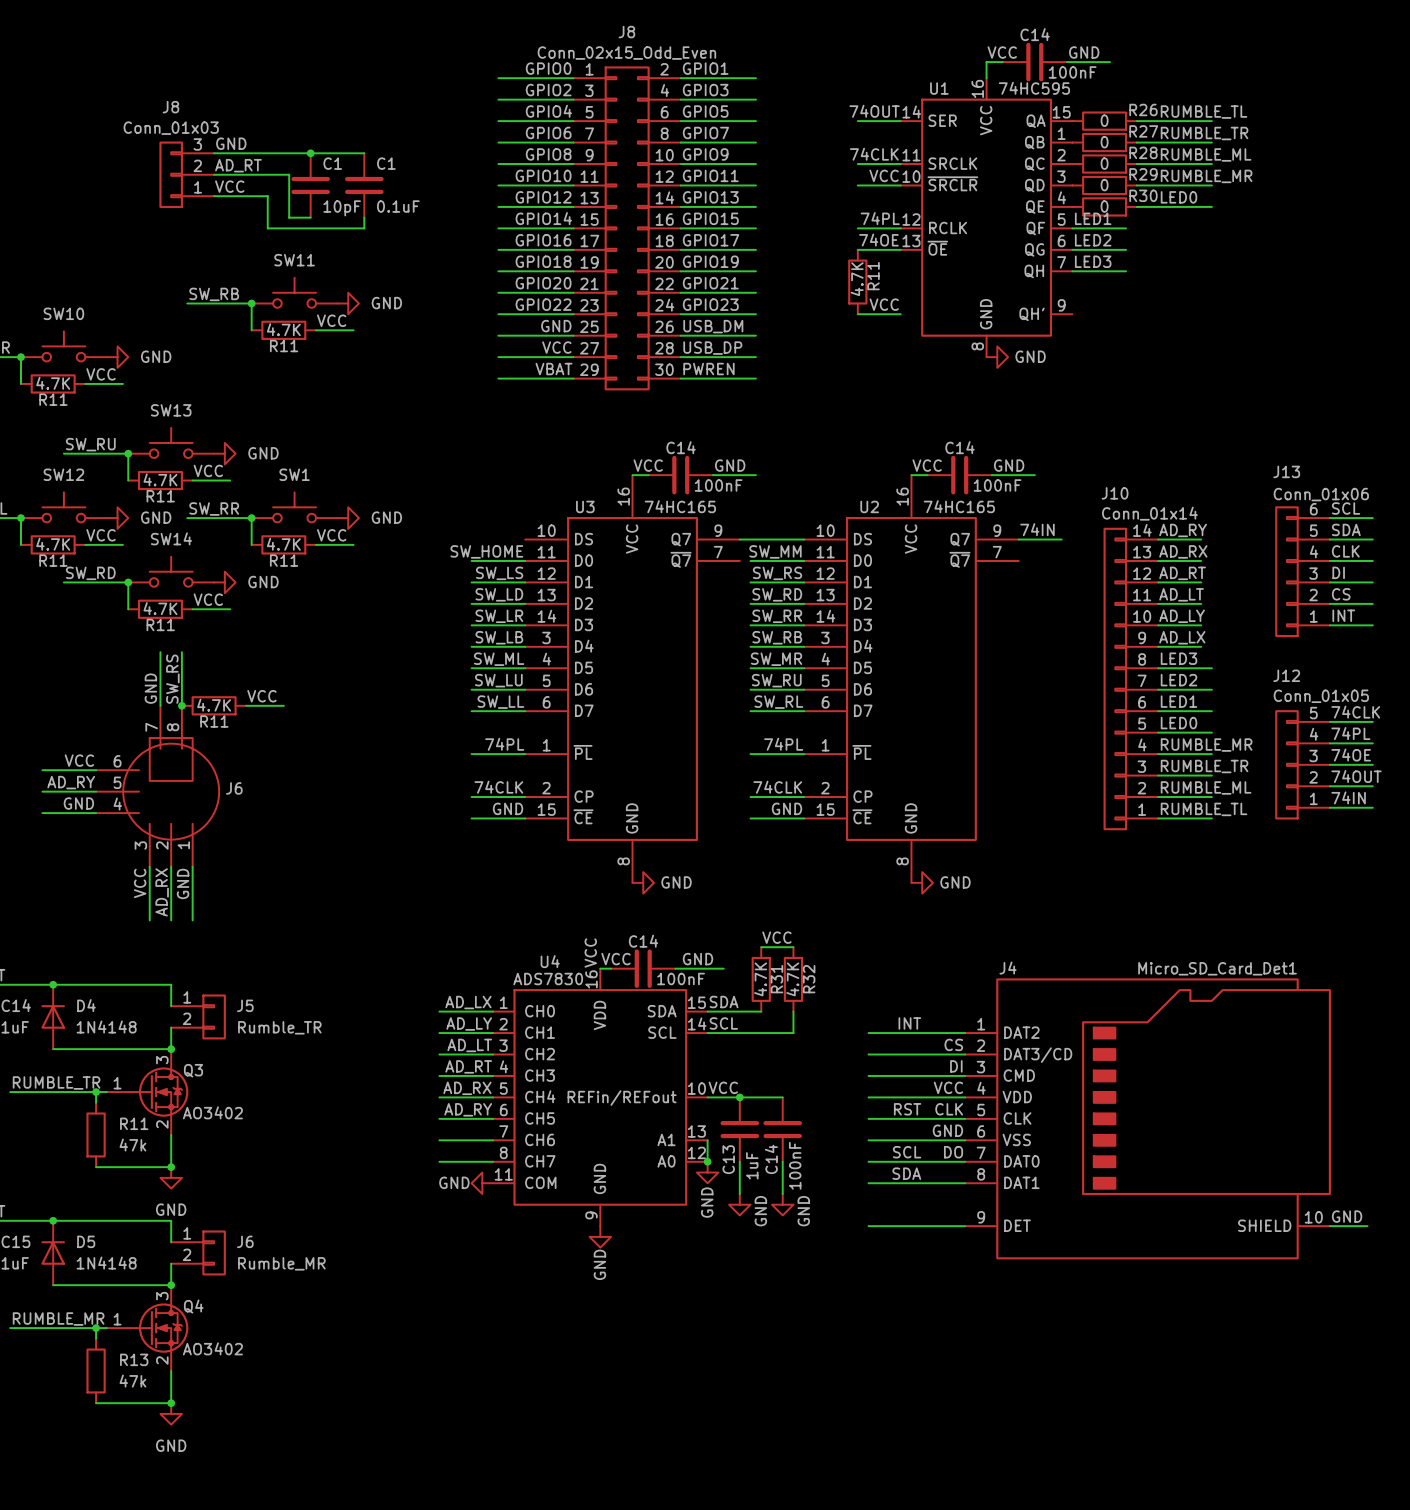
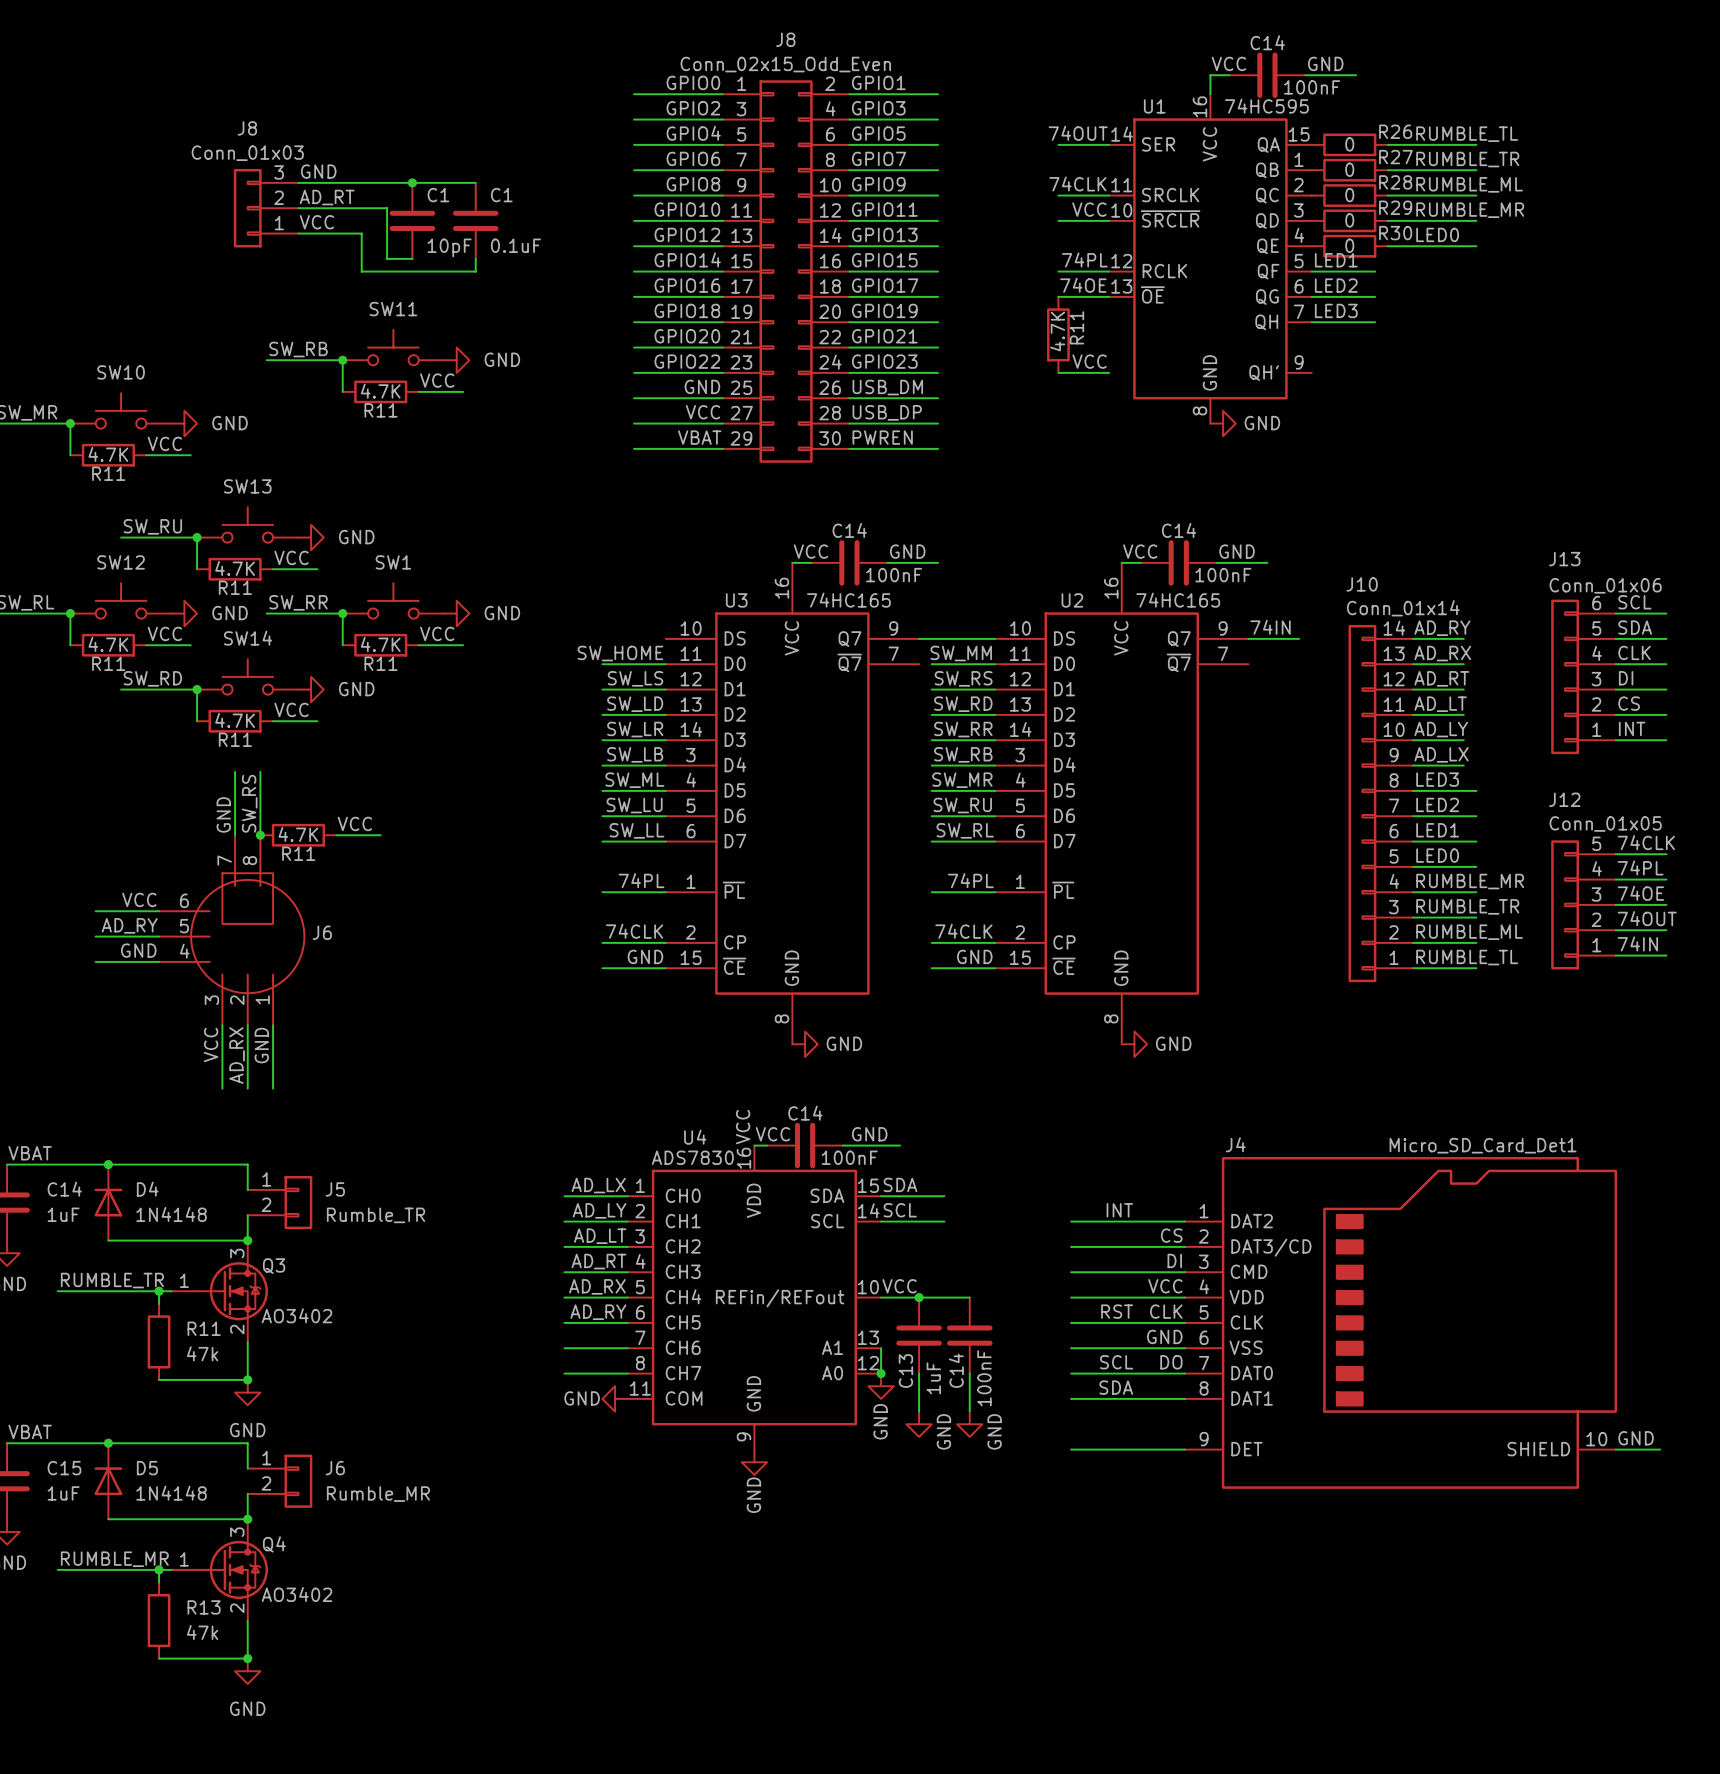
label: VCC (776, 937) -> none
wire: (761, 947) (793, 947) -> none
R31: 4.7K (761, 979) -> none
R32: 4.7K (793, 979) -> none
wire: (793, 1011) (793, 1033) (761, 1033) -> none

